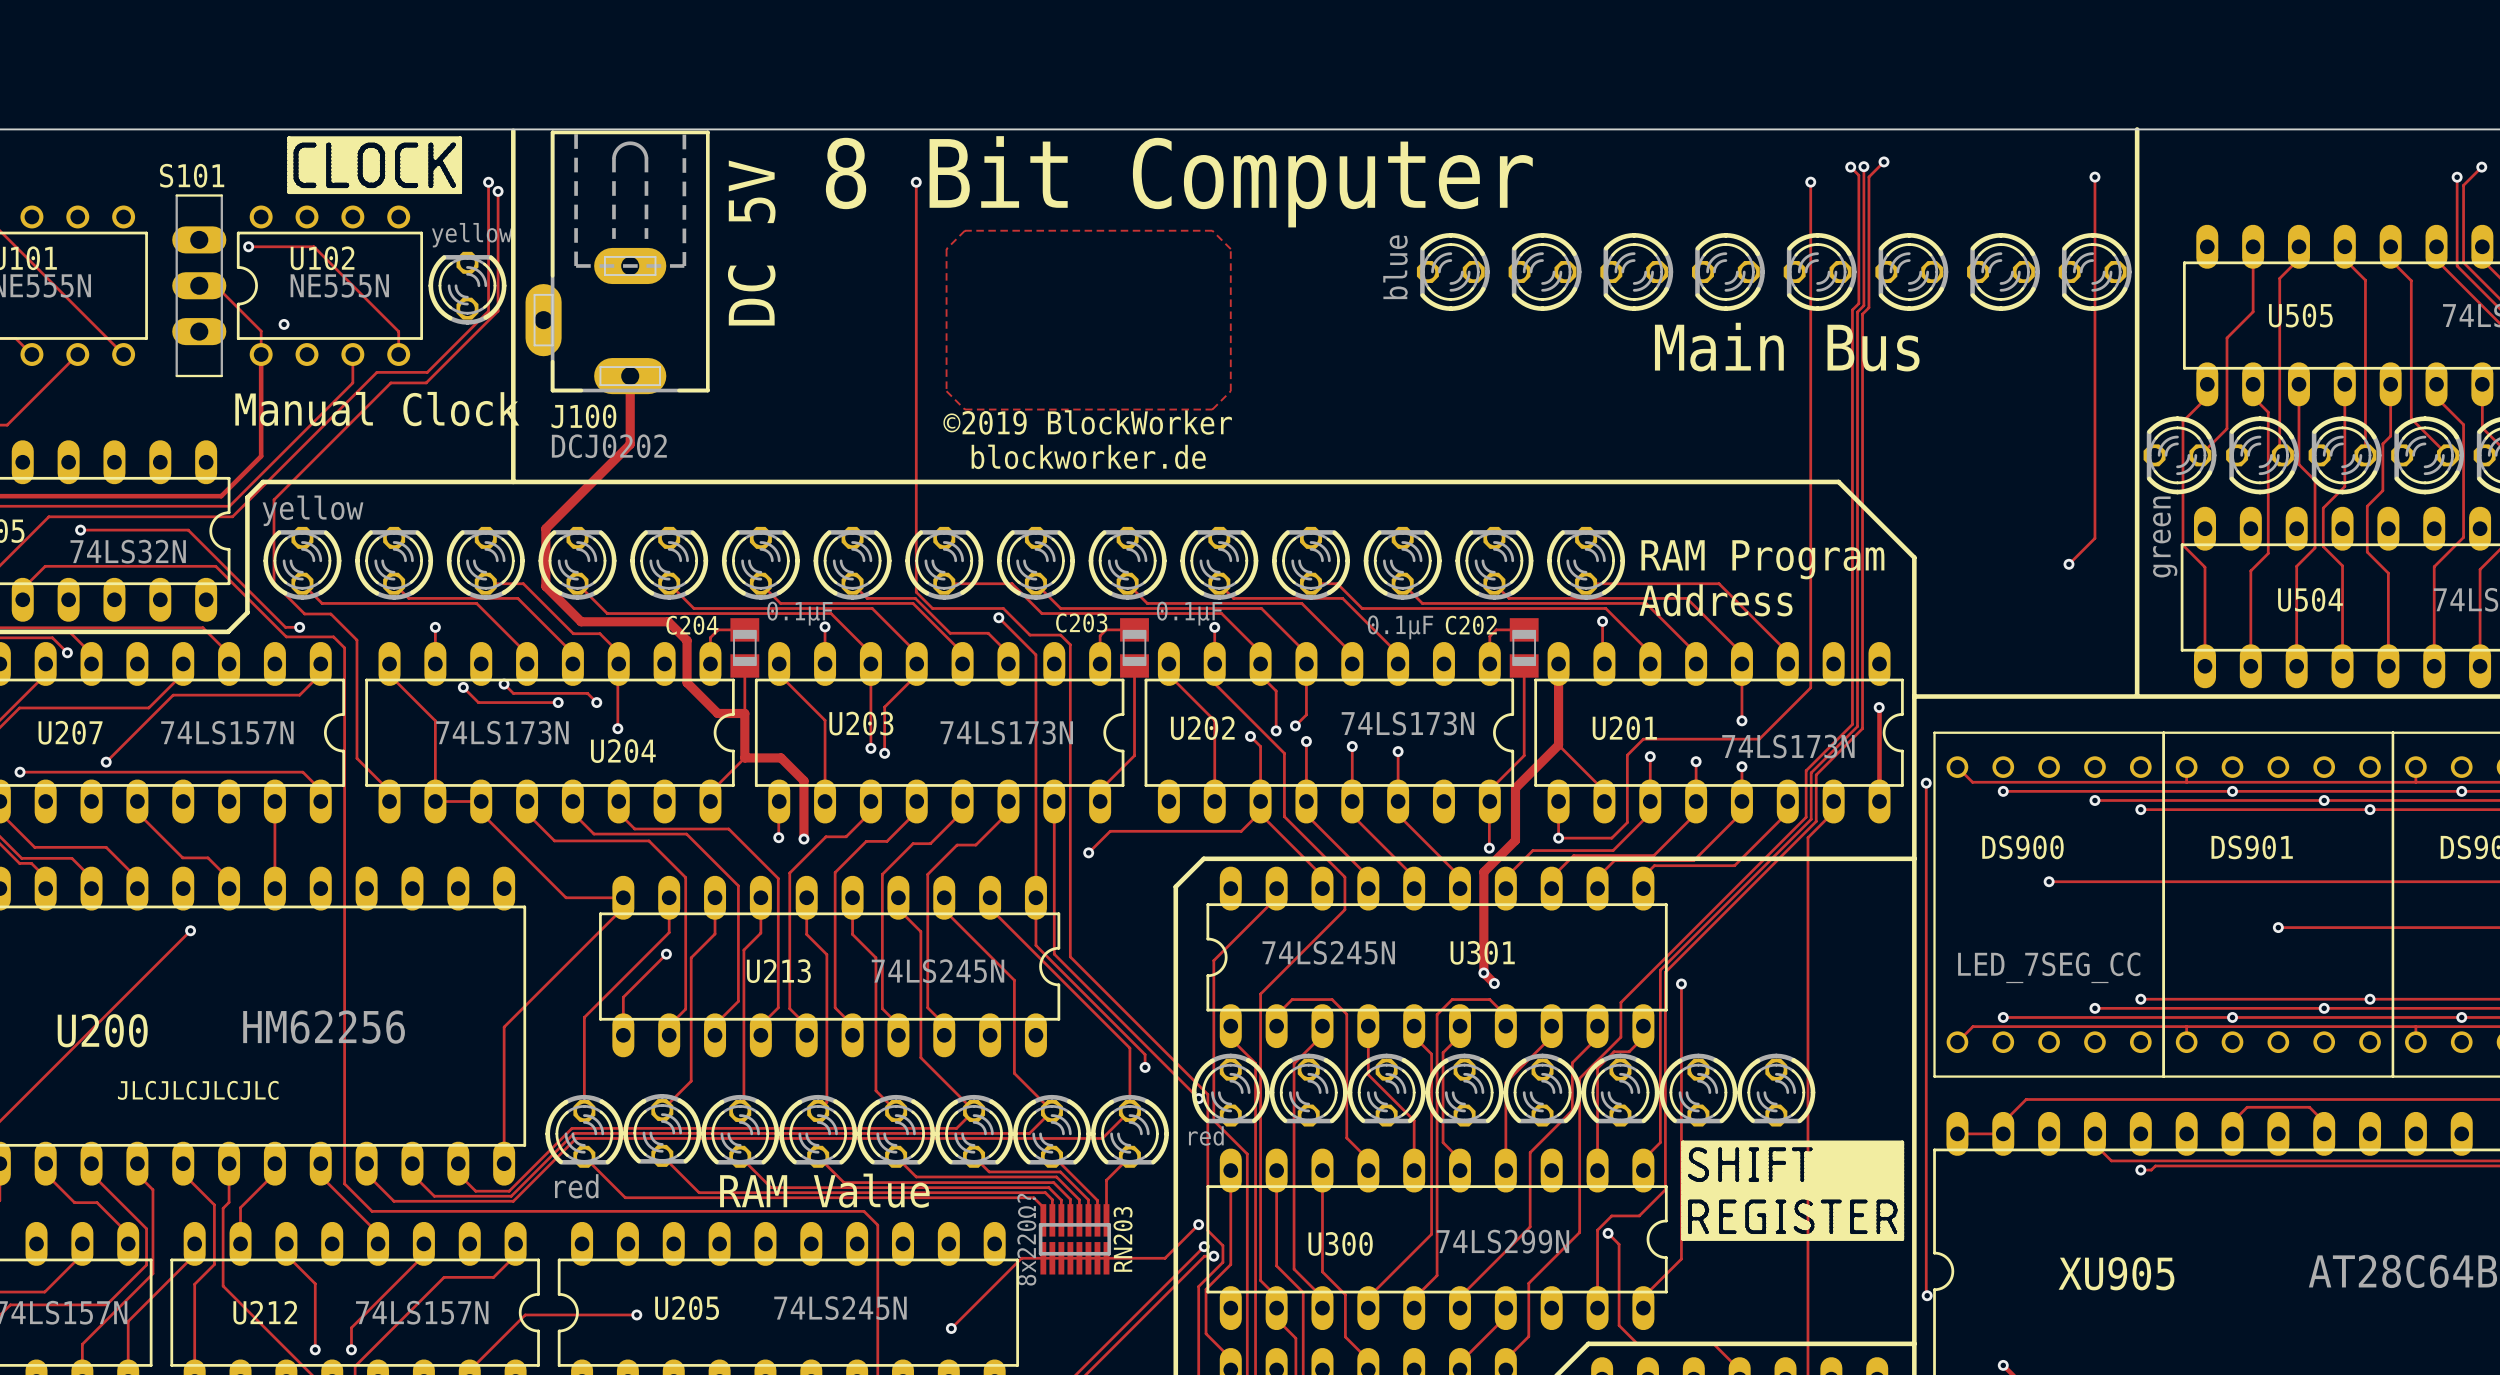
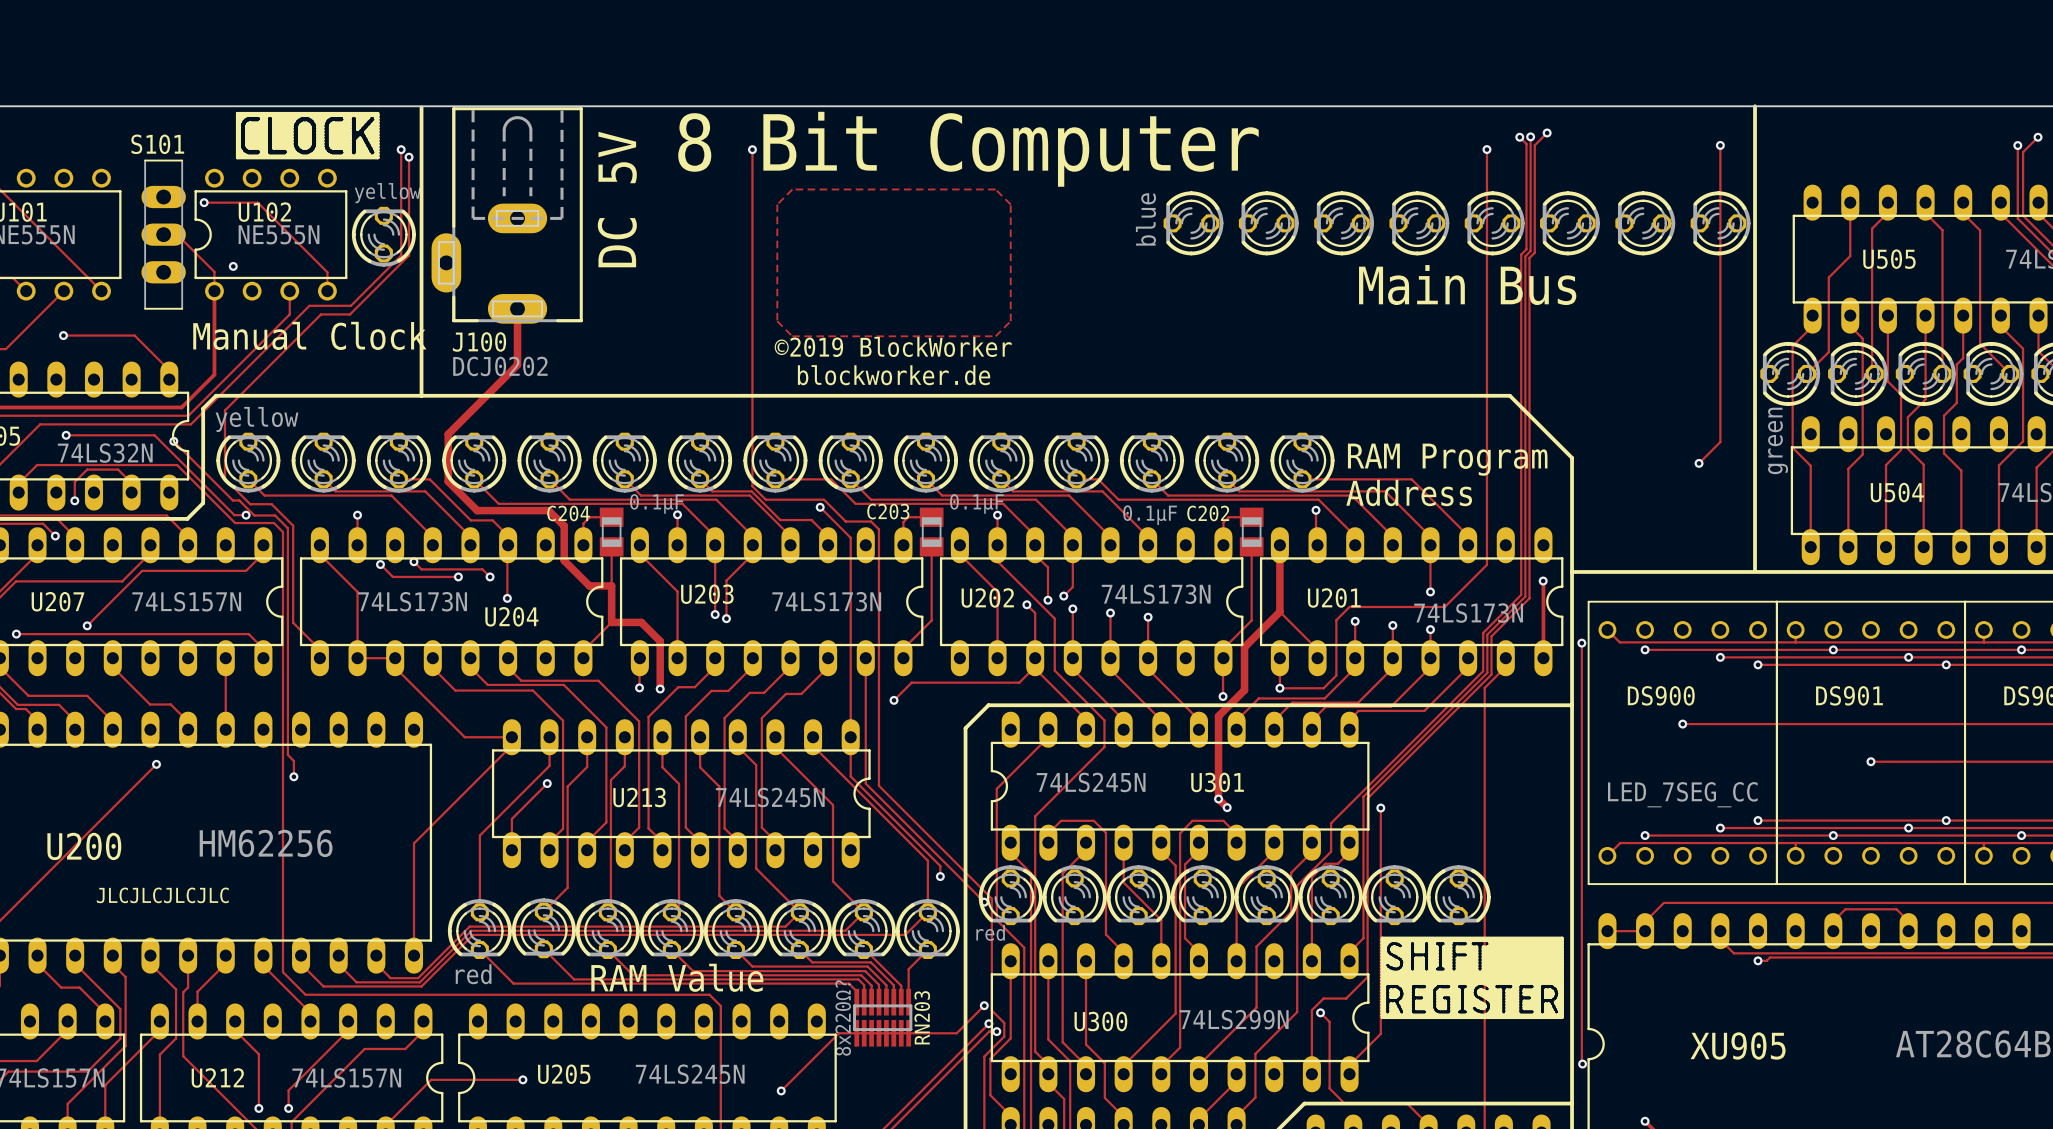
track: none -> (63, 335) (134, 335) (169, 370) (169, 379)
via: none -> (63, 335)
track: none -> (173, 441) (232, 500) (239, 500) (254, 515) (275, 515) (287, 528) (287, 754) (293, 760) (293, 776)
via: none -> (173, 441)
track: none -> (131, 492) (131, 483) (118, 469) (87, 469) (74, 482) (74, 500)
via: none -> (74, 500)
via: none -> (293, 776)

